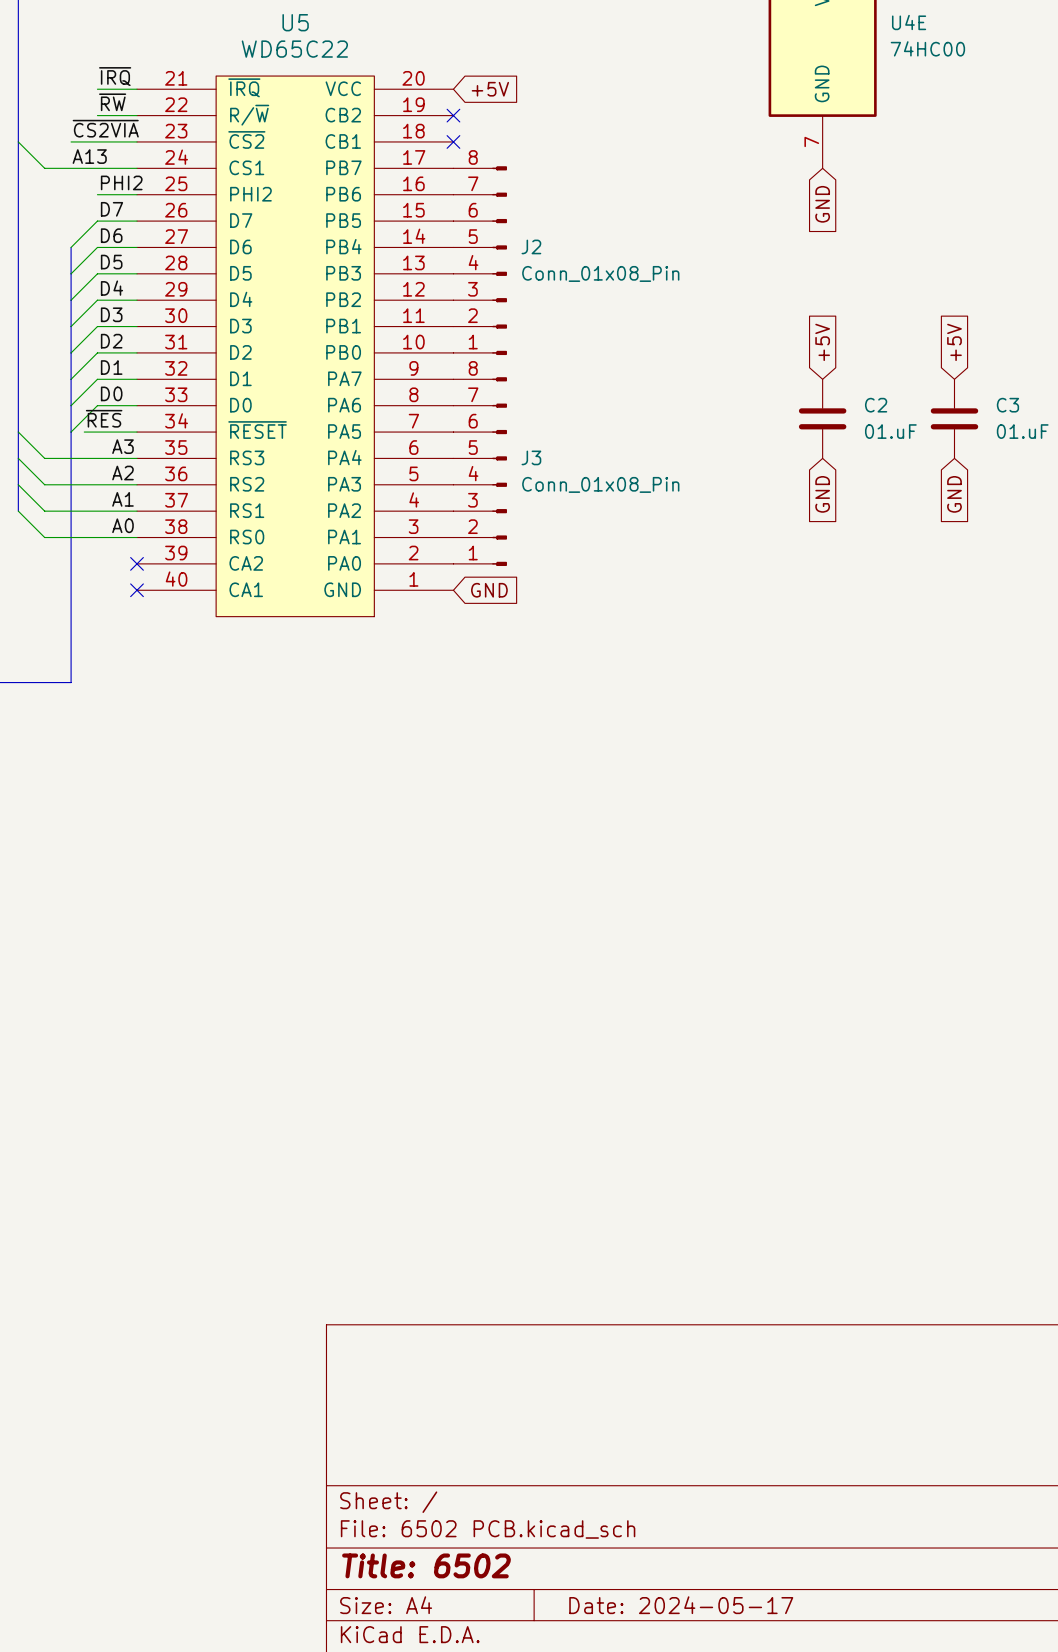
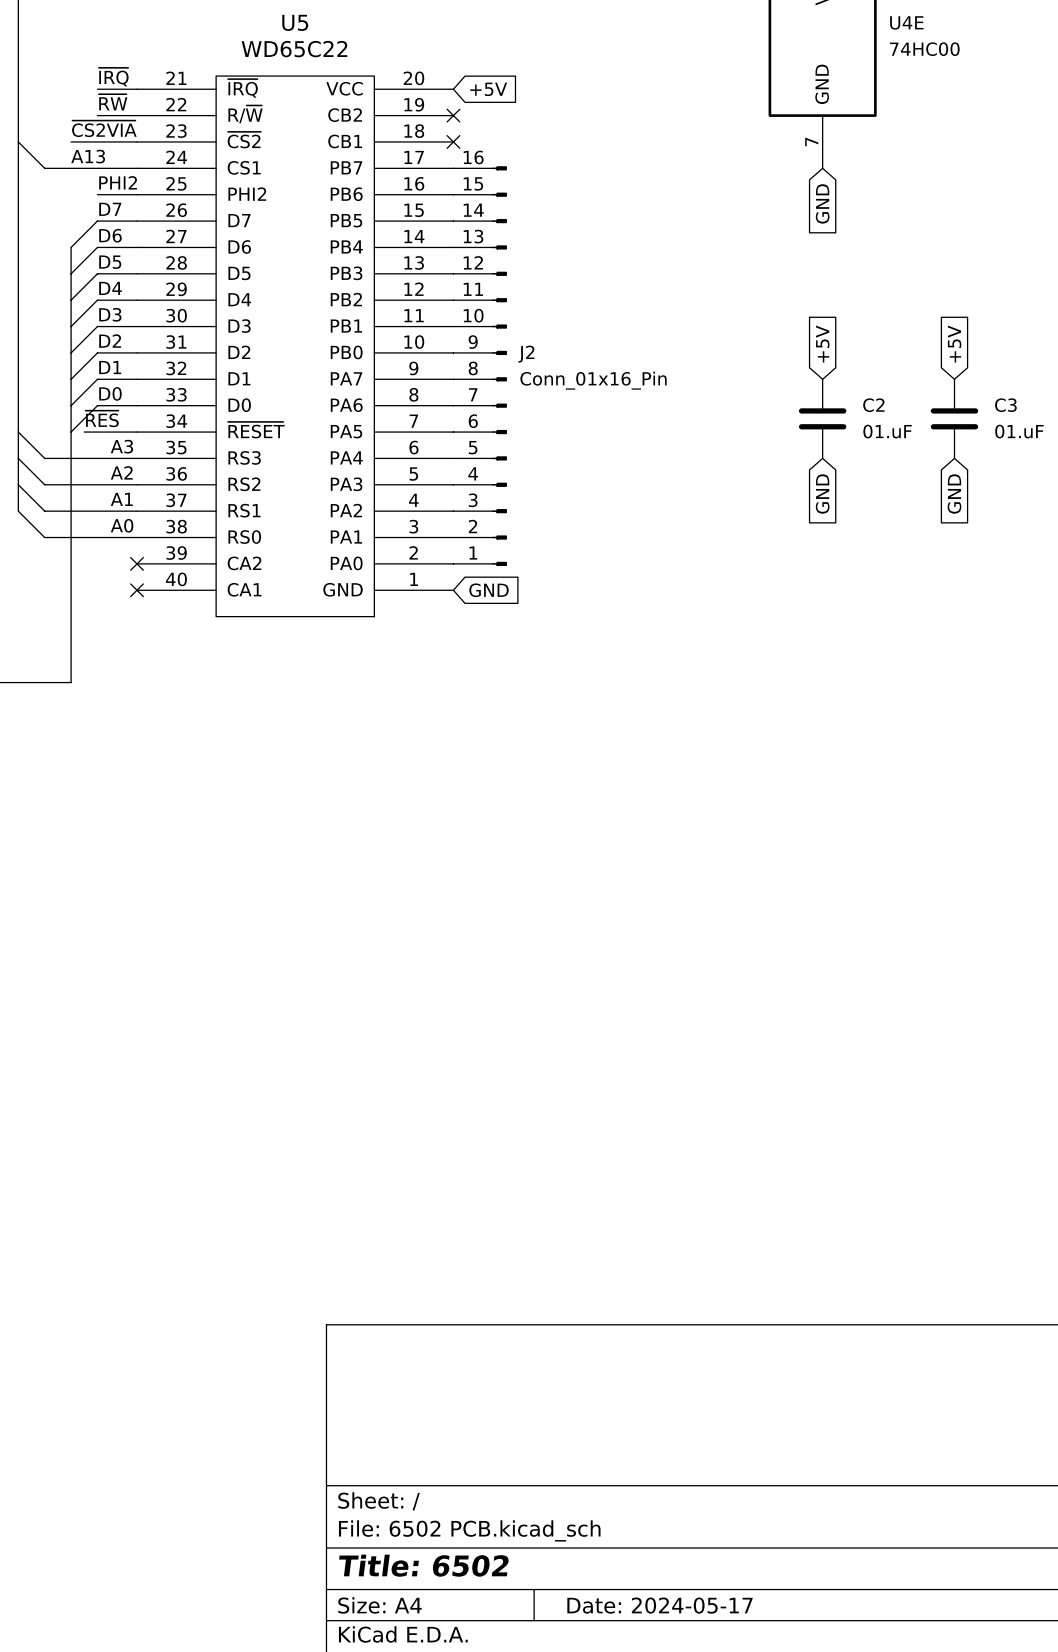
J2 symbol: [453, 166, 507, 356] -> [453, 166, 507, 567]
J2 value: Conn_01x08_Pin (600, 273) -> Conn_01x16_Pin (593, 380)
J3: Conn_01x08_Pin (480, 471) -> none

